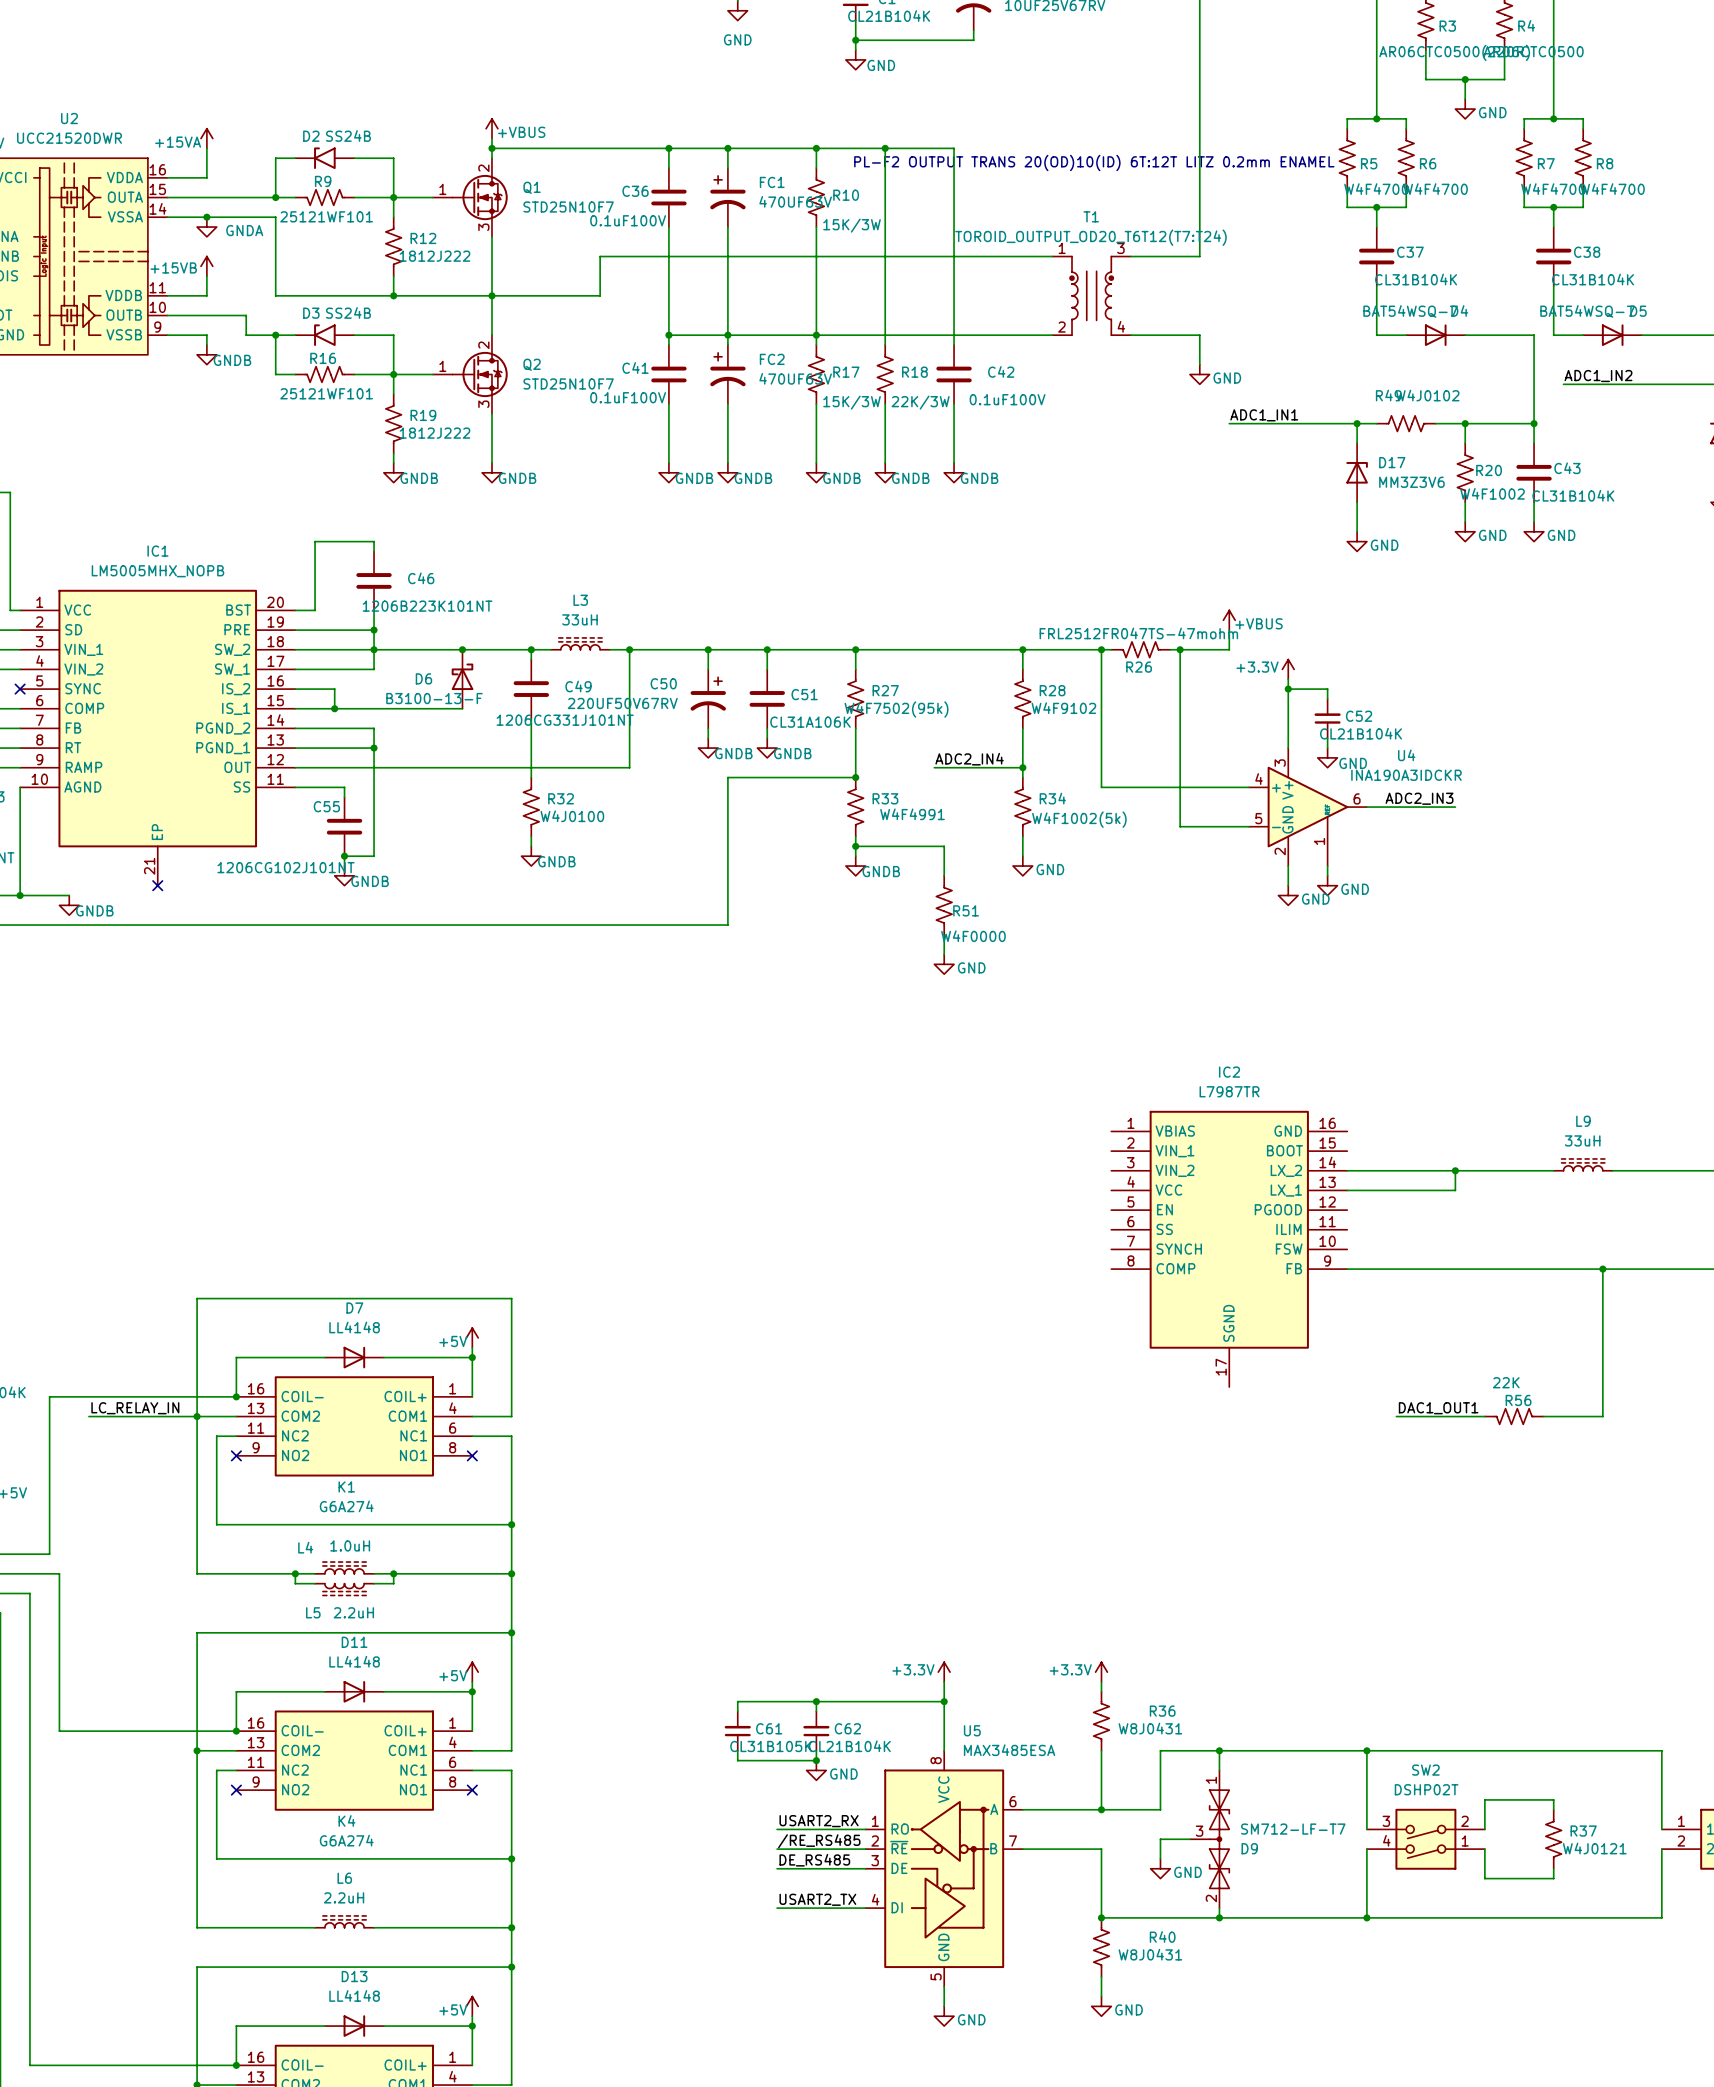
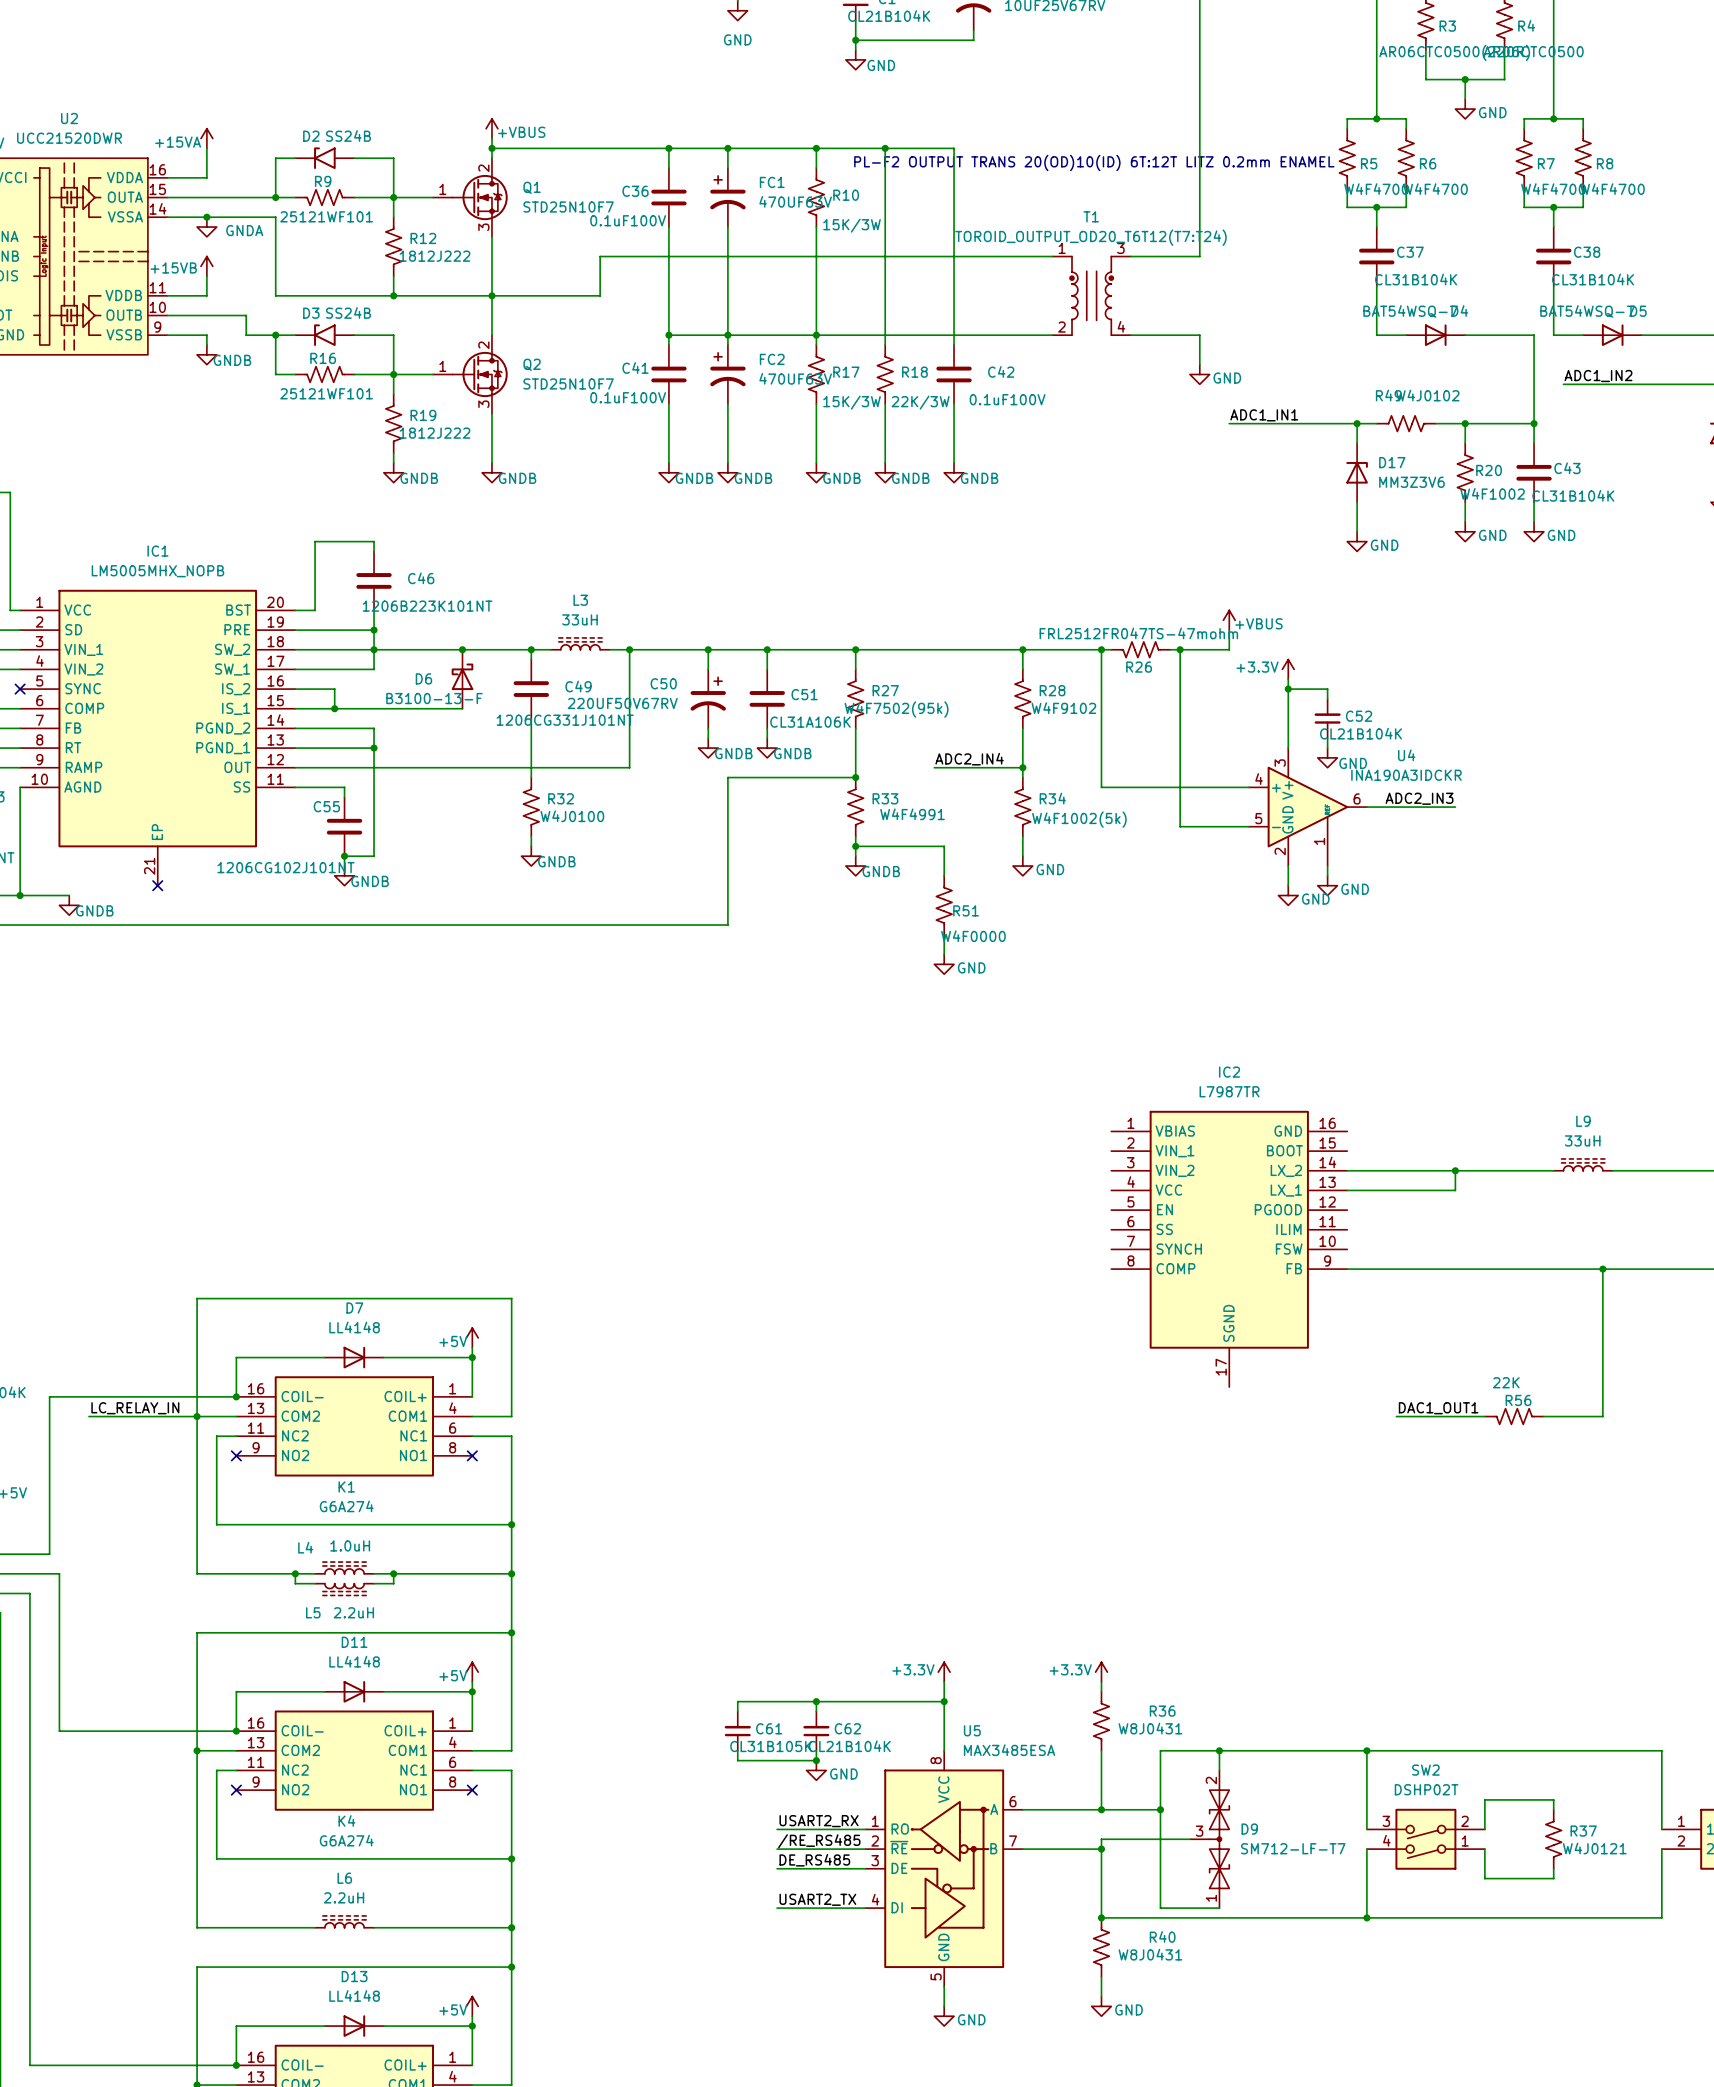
wire: none -> (1160, 1809) (1160, 1839) (1101, 1839) (1101, 1849)
junction: none -> (1160, 1809)
D9 flip: as is (1219, 1839) -> up-down (1219, 1839)
junction: none -> (1101, 1849)
power symbol: GND (1160, 1868) -> none
wire: (1219, 1908) (1219, 1917) -> (1219, 1908) (1160, 1908) (1160, 1858)
junction: (1219, 1917) -> none

